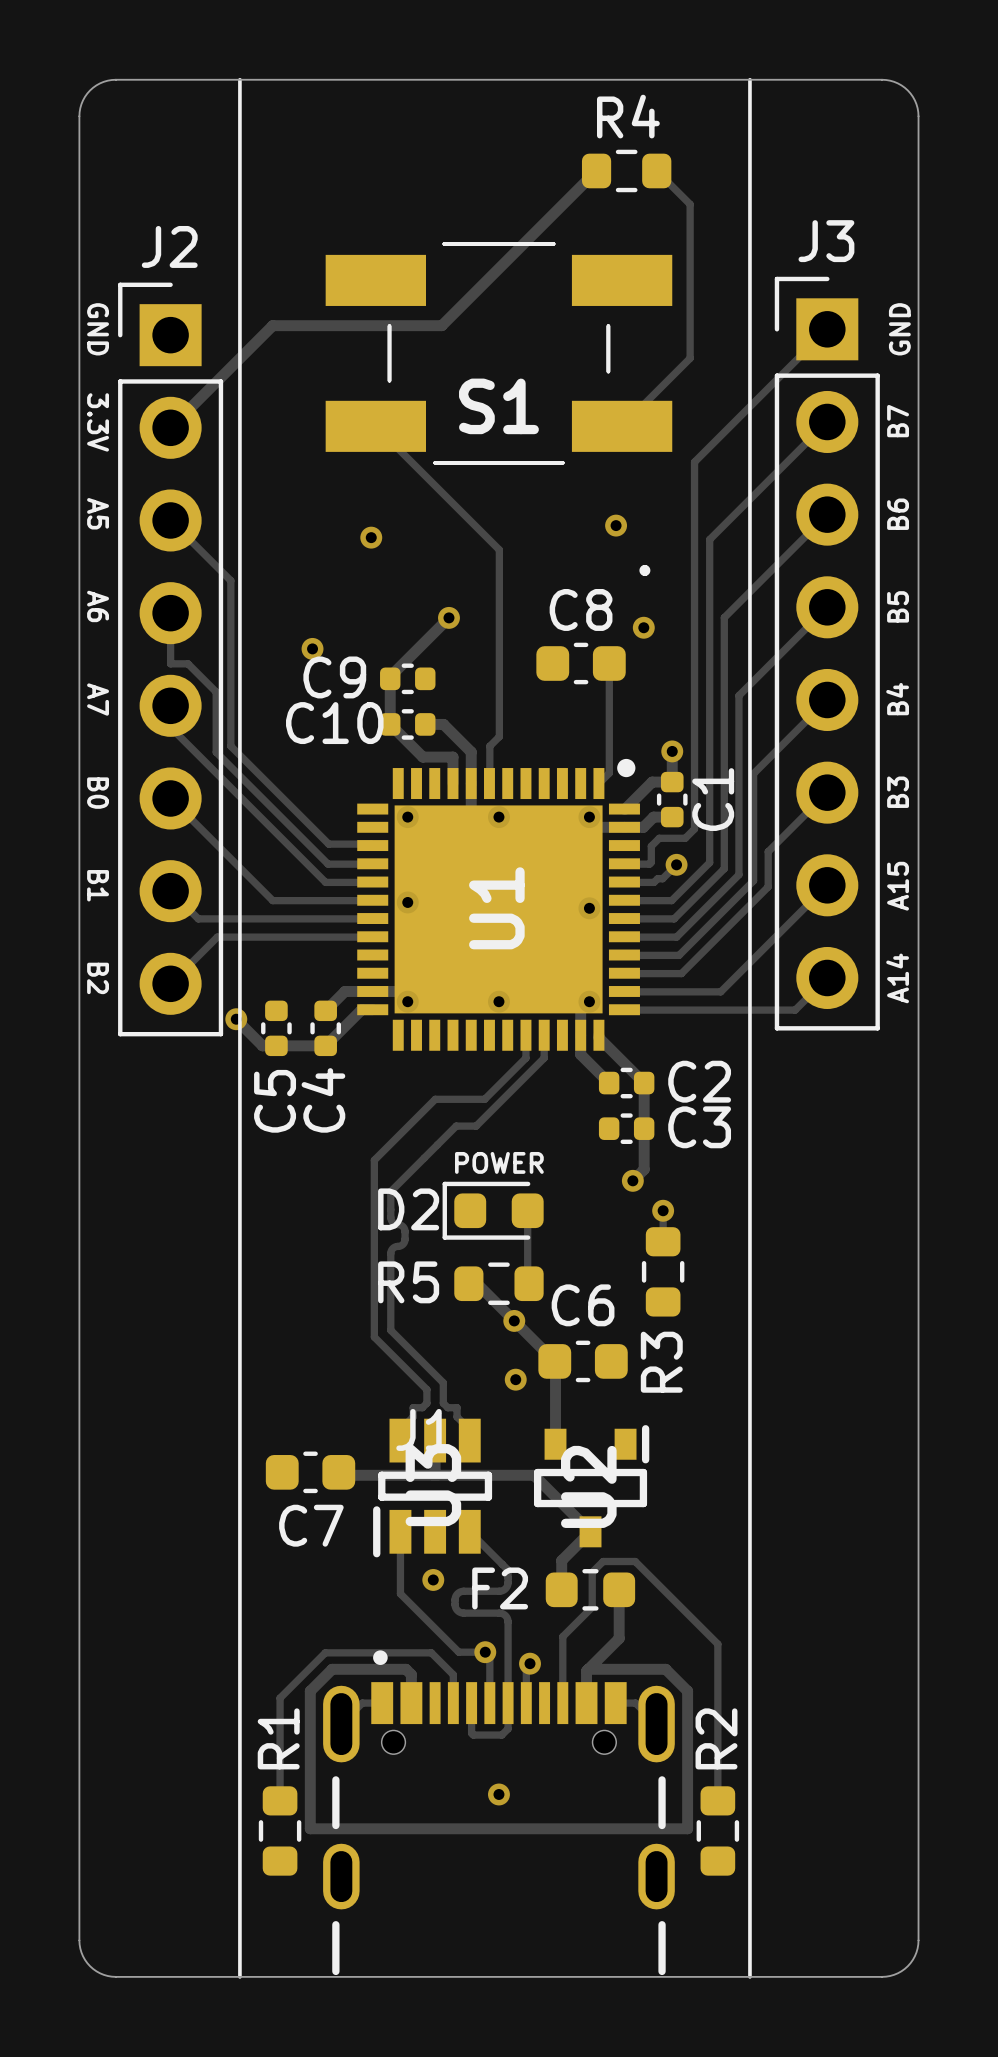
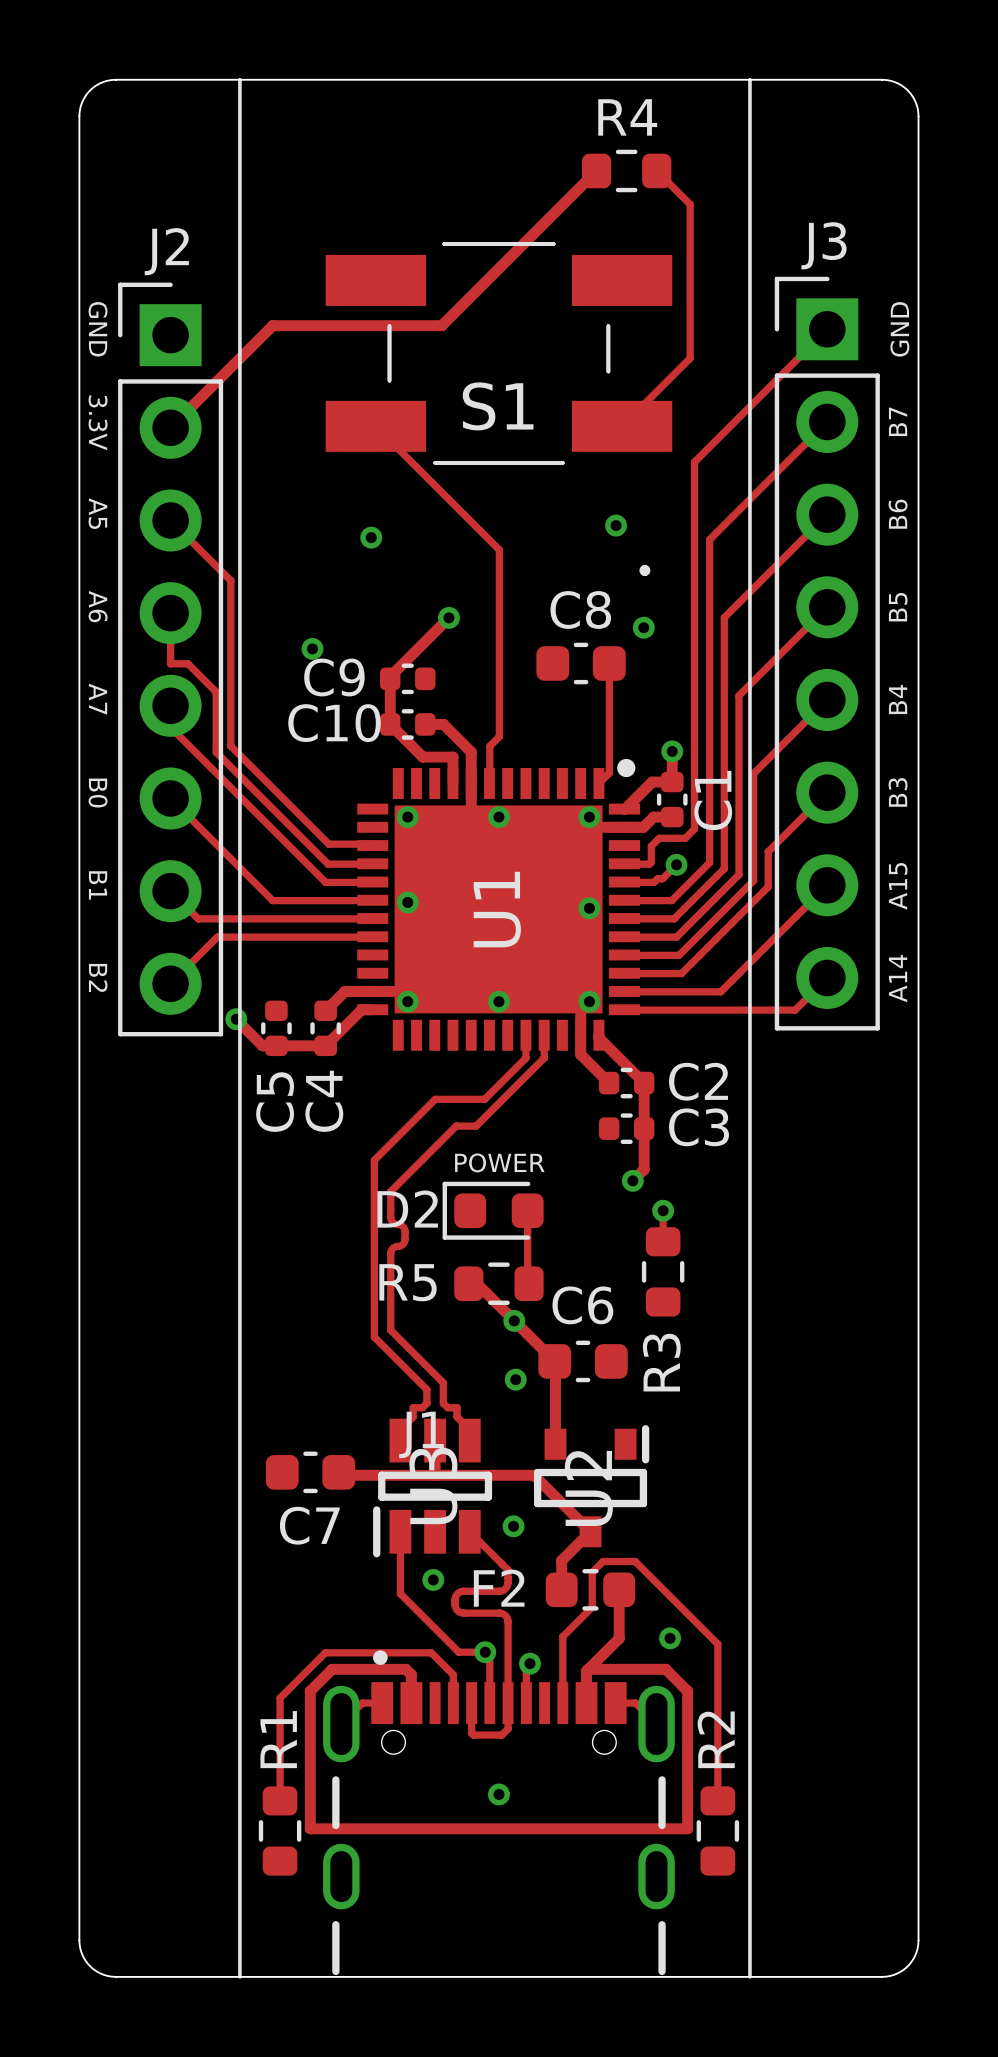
via: none -> (513, 1526)
via: none -> (670, 1638)

